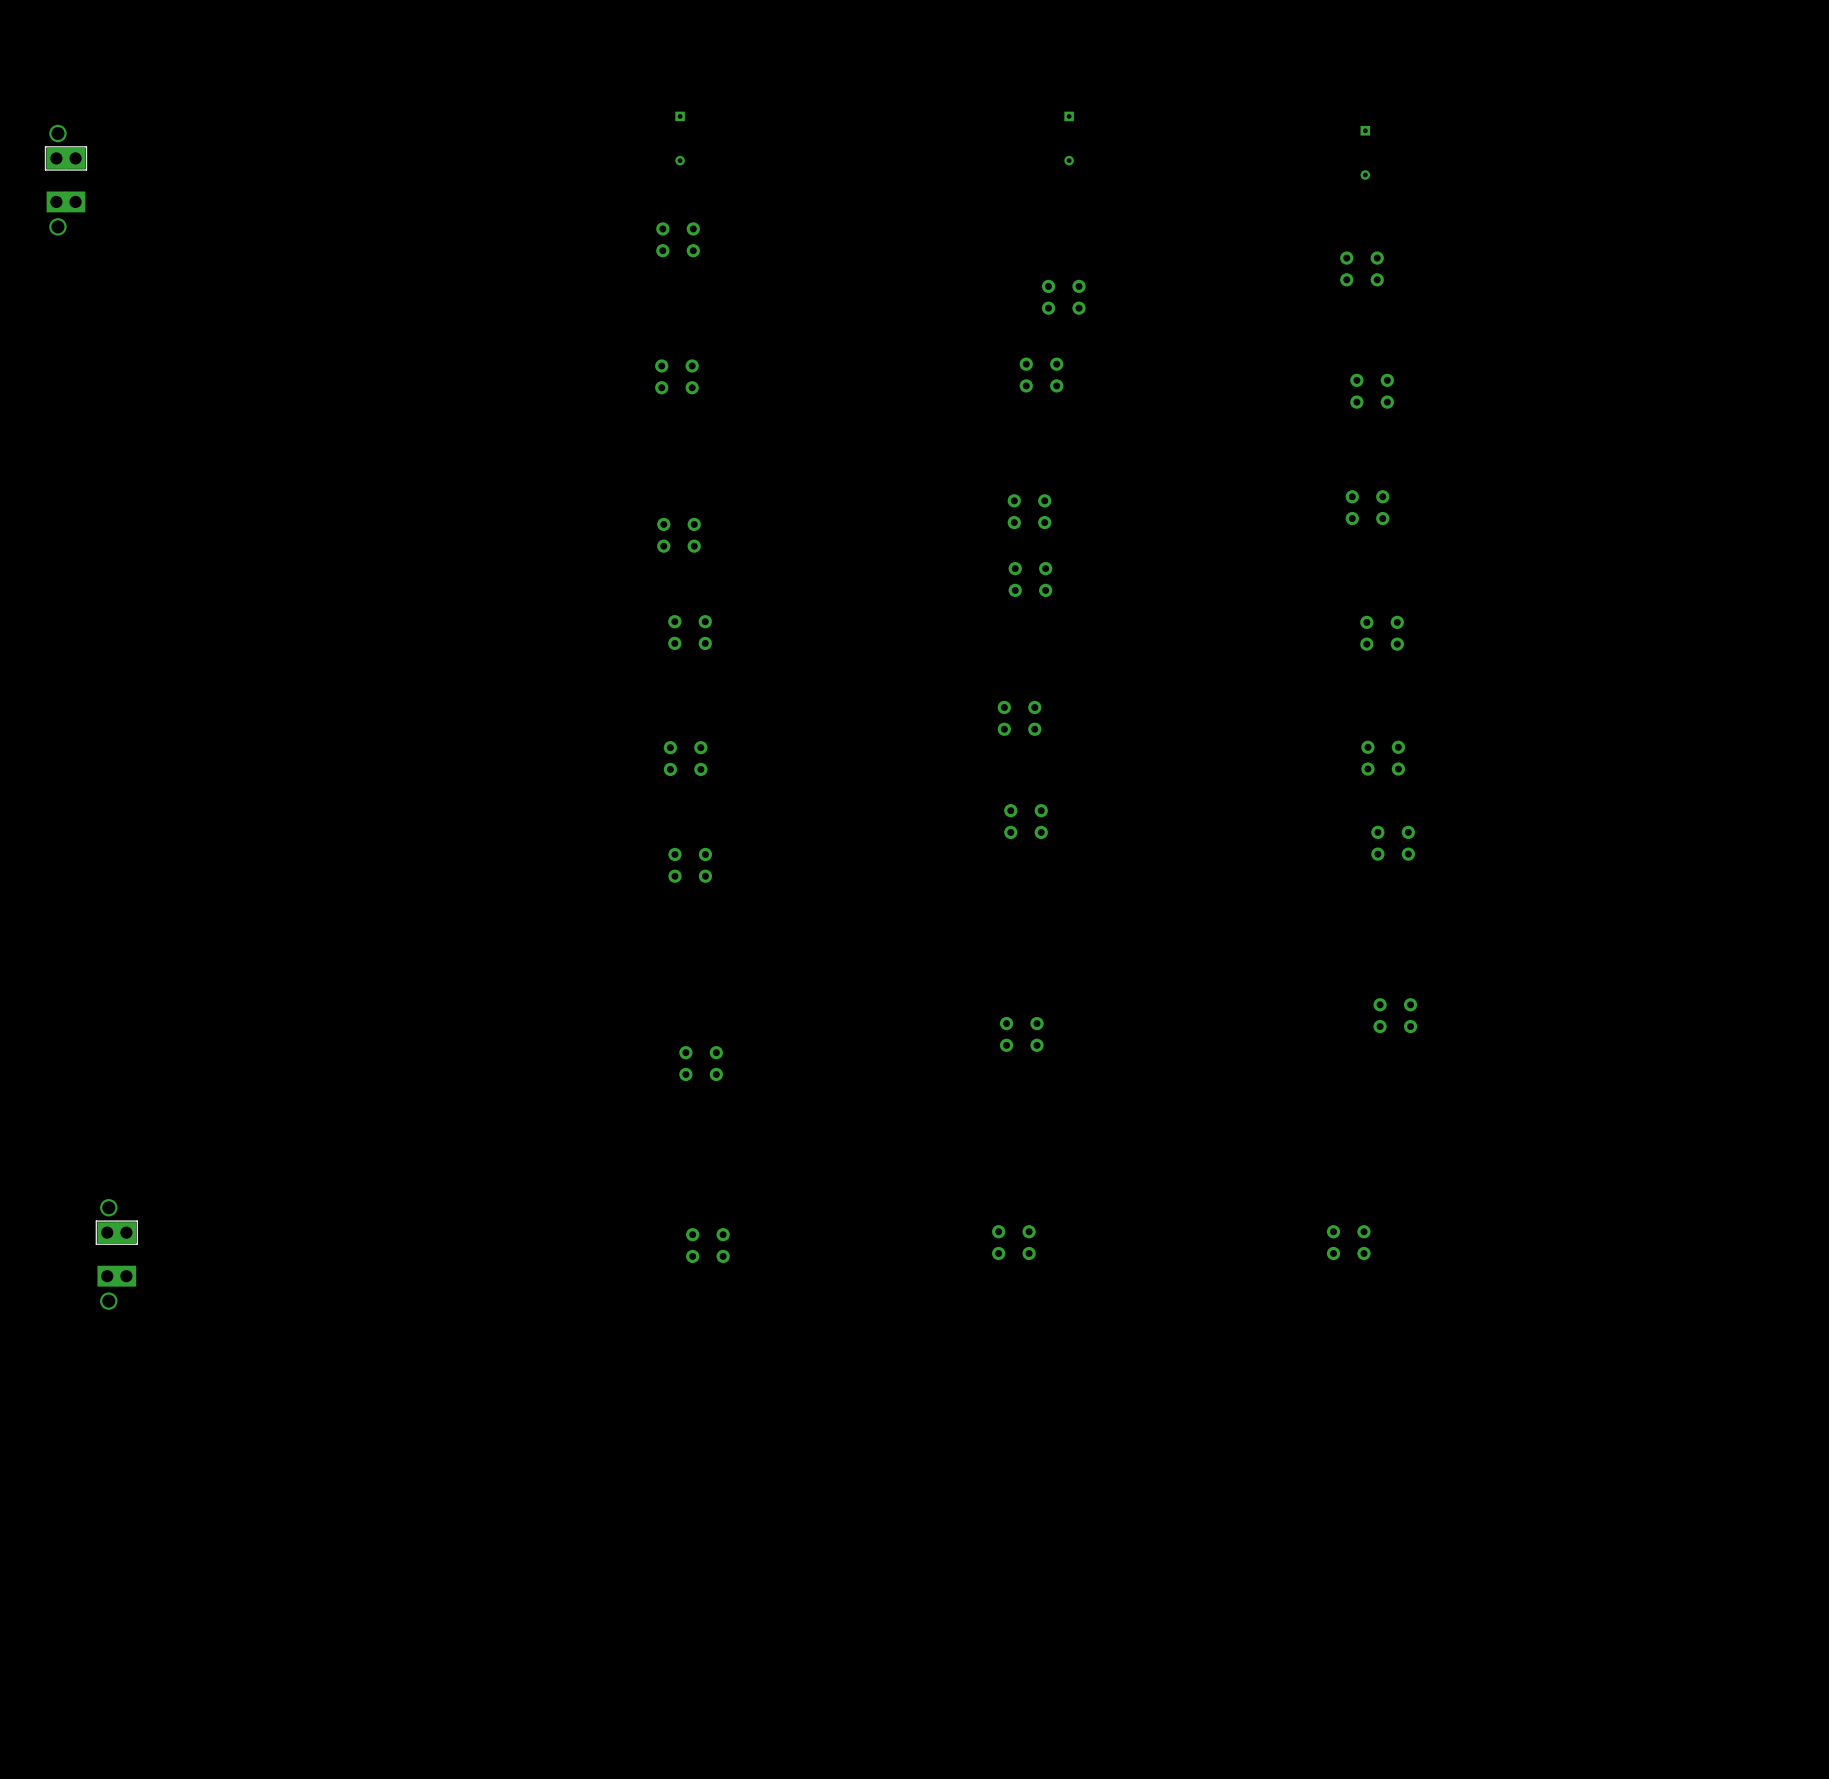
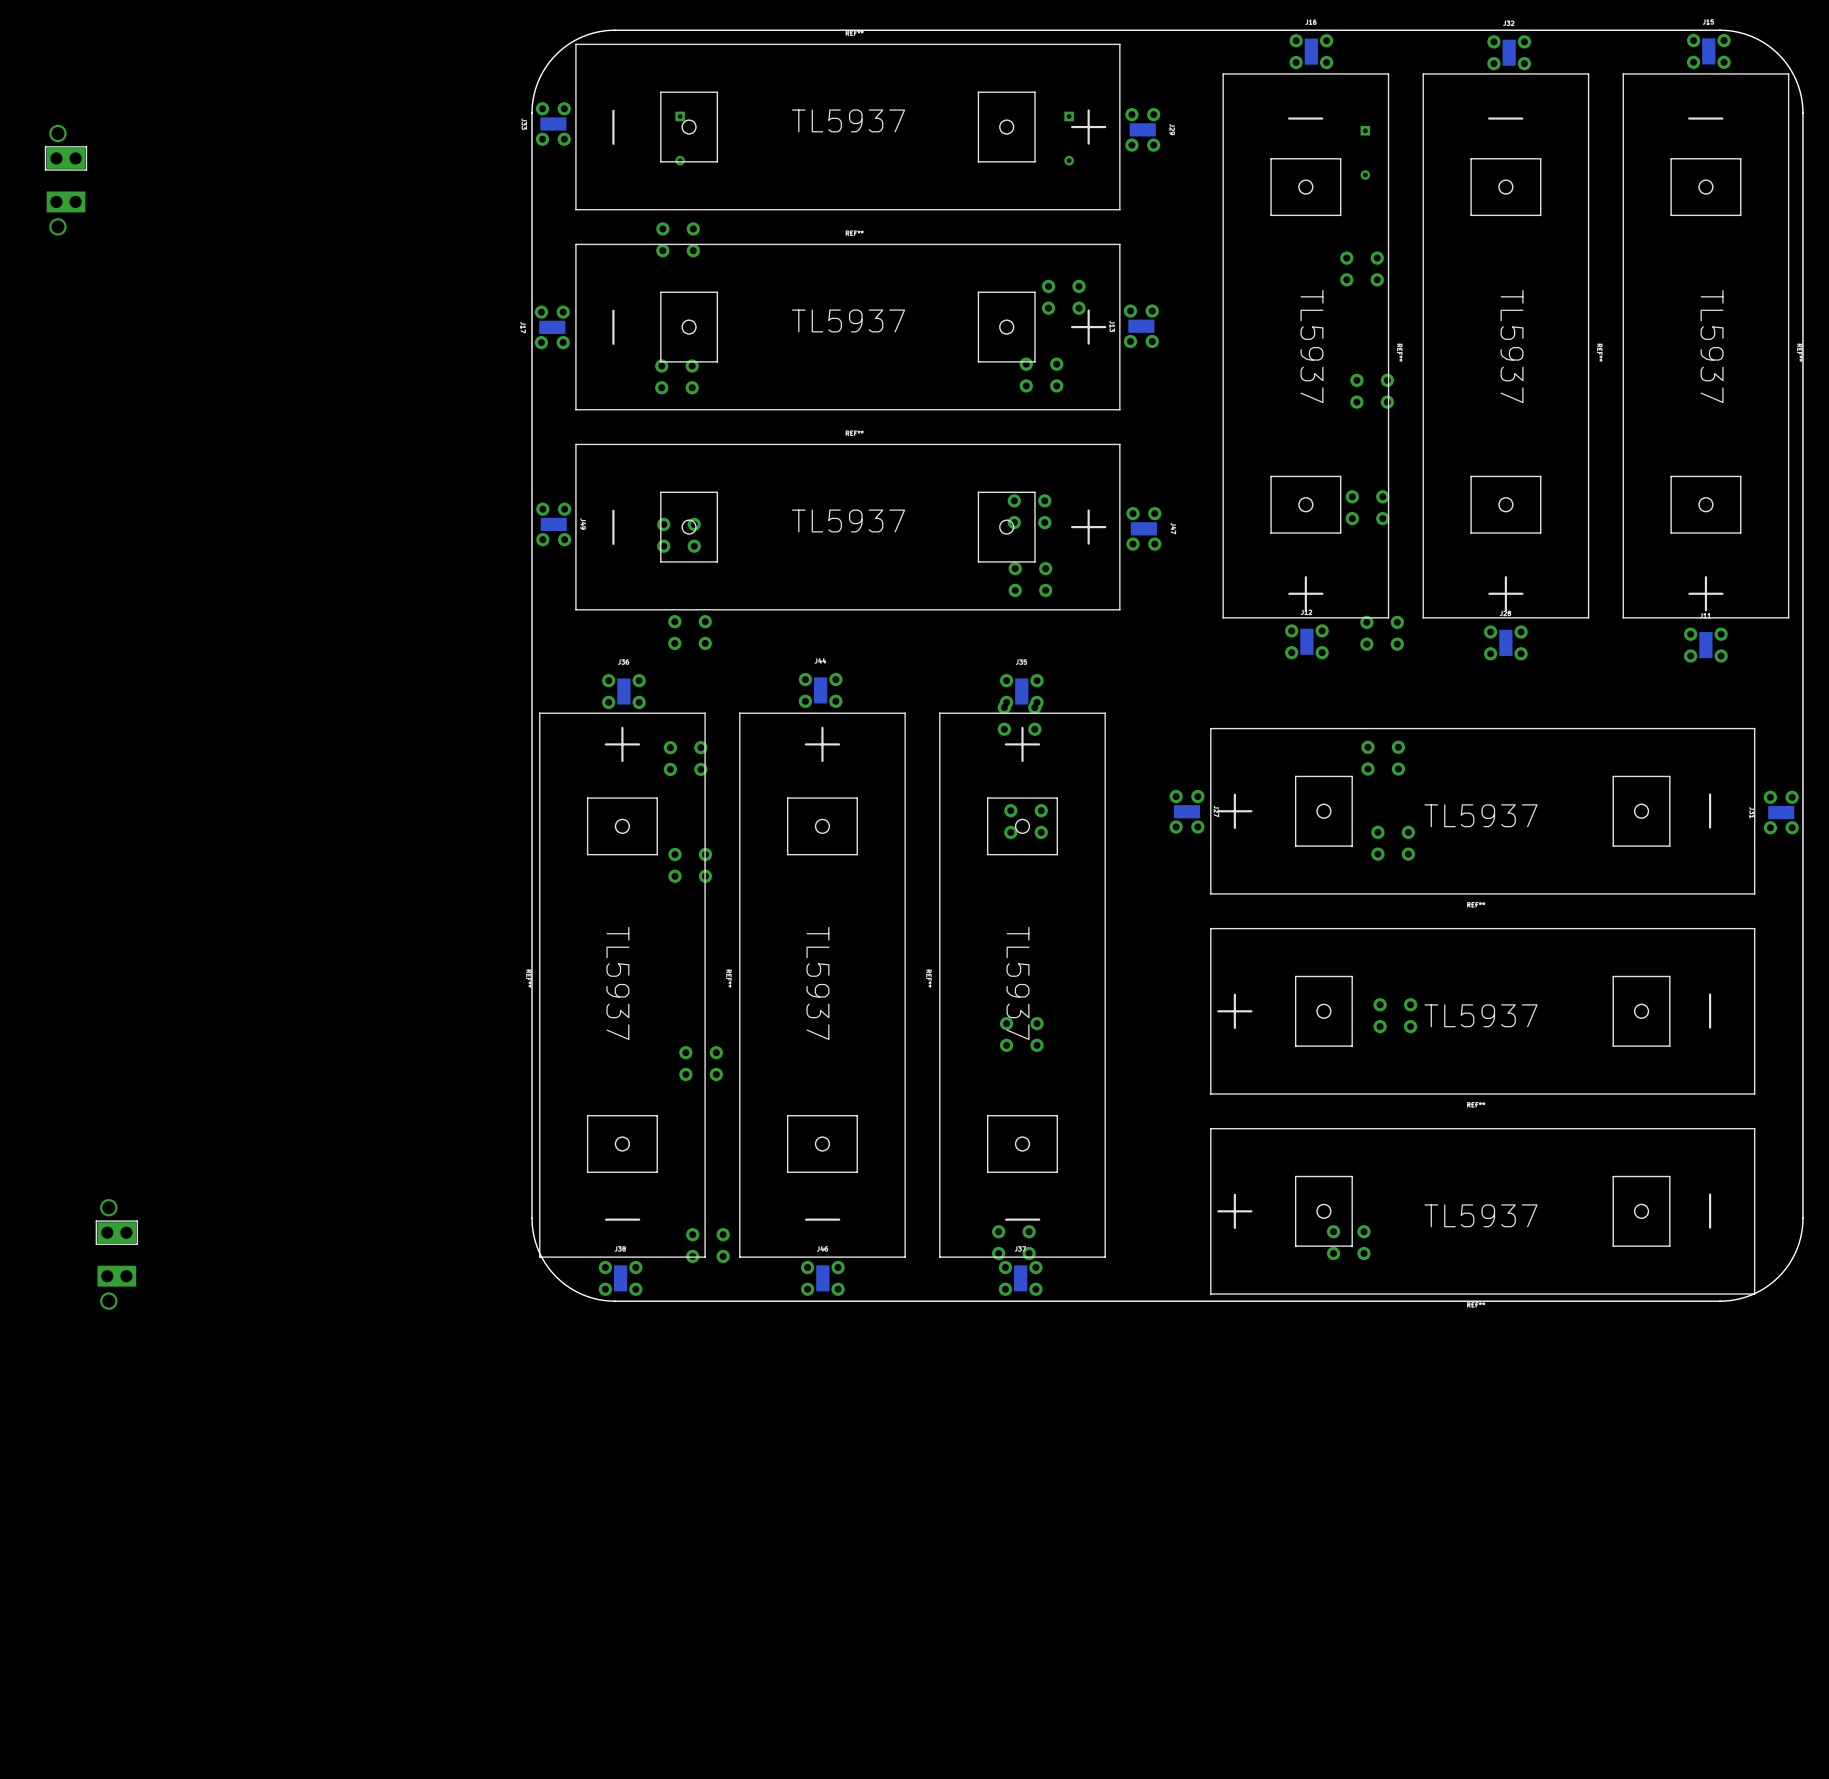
board edge: none -> (1720, 30) (614, 30) (601, 31) (583, 36) (566, 45) (553, 57) (538, 81) (533, 99) (532, 113) (532, 1218) (533, 1232) (538, 1250) (547, 1266) (559, 1280) (583, 1294) (601, 1300) (614, 1301) (1720, 1301) (1738, 1299) (1756, 1292) (1768, 1285) (1781, 1273) (1796, 1250) (1801, 1232) (1802, 1218) (1802, 108) (1800, 94) (1794, 77) (1778, 54) (1764, 42) (1751, 36) (1733, 31) (1720, 30)
part: none -> (1311, 51)
part: none -> (1708, 51)
part: none -> (1509, 52)
part: none -> (553, 123)
part: none -> TL5937 (847, 127)
part: none -> (1142, 129)
part: none -> (1141, 326)
part: none -> (552, 327)
part: none -> TL5937 (847, 327)
part: none -> TL5937 (1305, 345)
part: none -> TL5937 (1505, 345)
part: none -> TL5937 (1705, 345)
part: none -> (553, 524)
part: none -> TL5937 (847, 527)
part: none -> (1143, 528)
part: none -> (1306, 641)
part: none -> (1505, 642)
part: none -> (1705, 645)
part: none -> (820, 690)
part: none -> (623, 691)
part: none -> (1021, 691)
part: none -> (1186, 811)
part: none -> TL5937 (1482, 811)
part: none -> (1781, 812)
part: none -> TL5937 (622, 985)
part: none -> TL5937 (822, 985)
part: none -> TL5937 (1022, 985)
part: none -> TL5937 (1482, 1011)
part: none -> TL5937 (1482, 1211)
part: none -> (620, 1278)
part: none -> (822, 1278)
part: none -> (1020, 1278)

